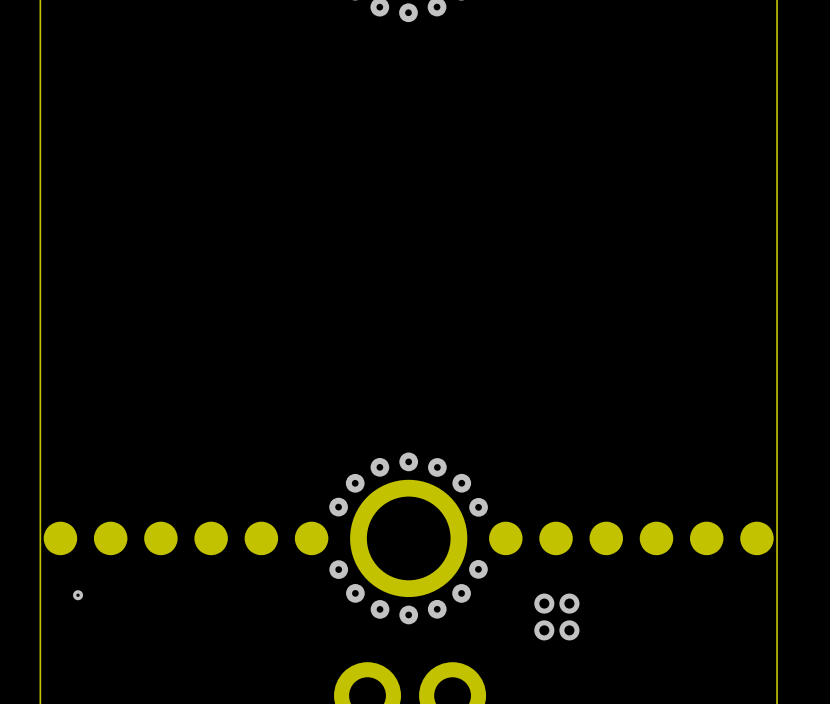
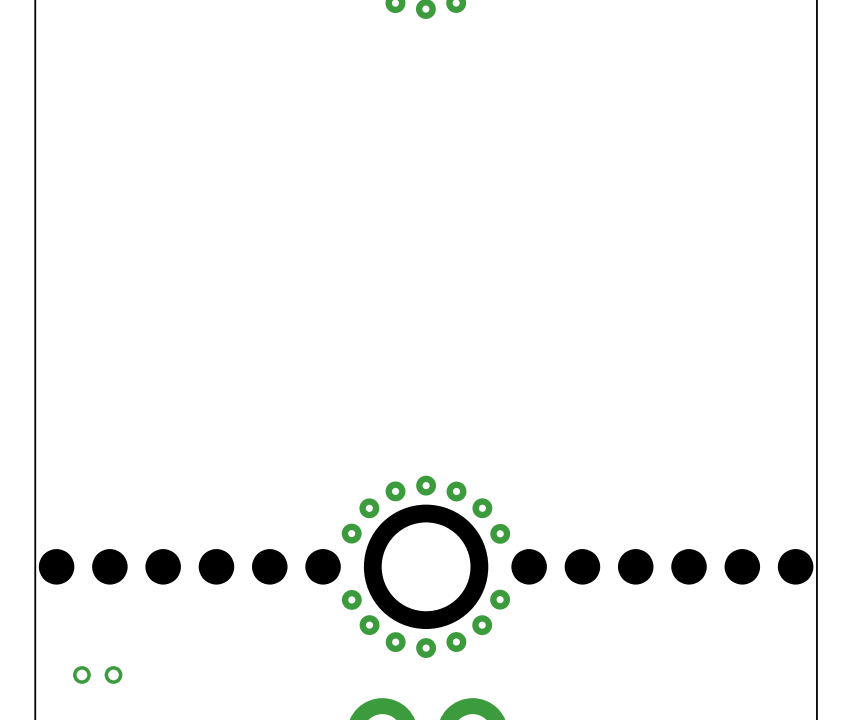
via: (78, 595) -> none
via: (544, 603) -> none
via: (569, 603) -> none
via: (544, 630) -> none
via: (569, 630) -> none
via: none -> (81, 674)
via: none -> (113, 674)

